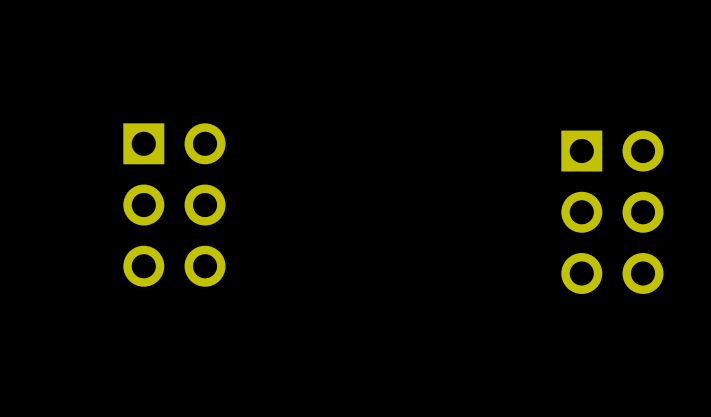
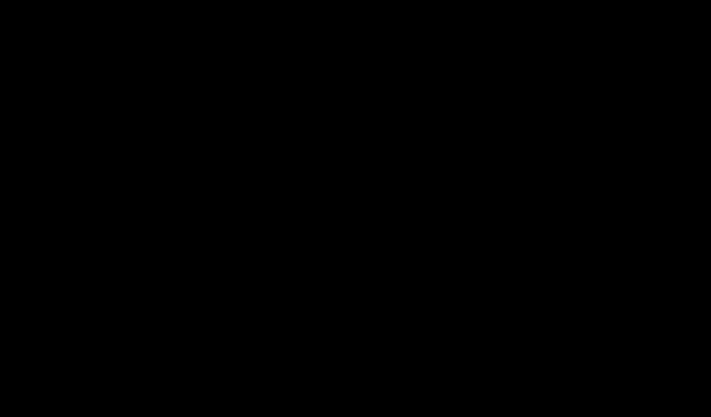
part: (174, 205) -> none
part: (612, 212) -> none

